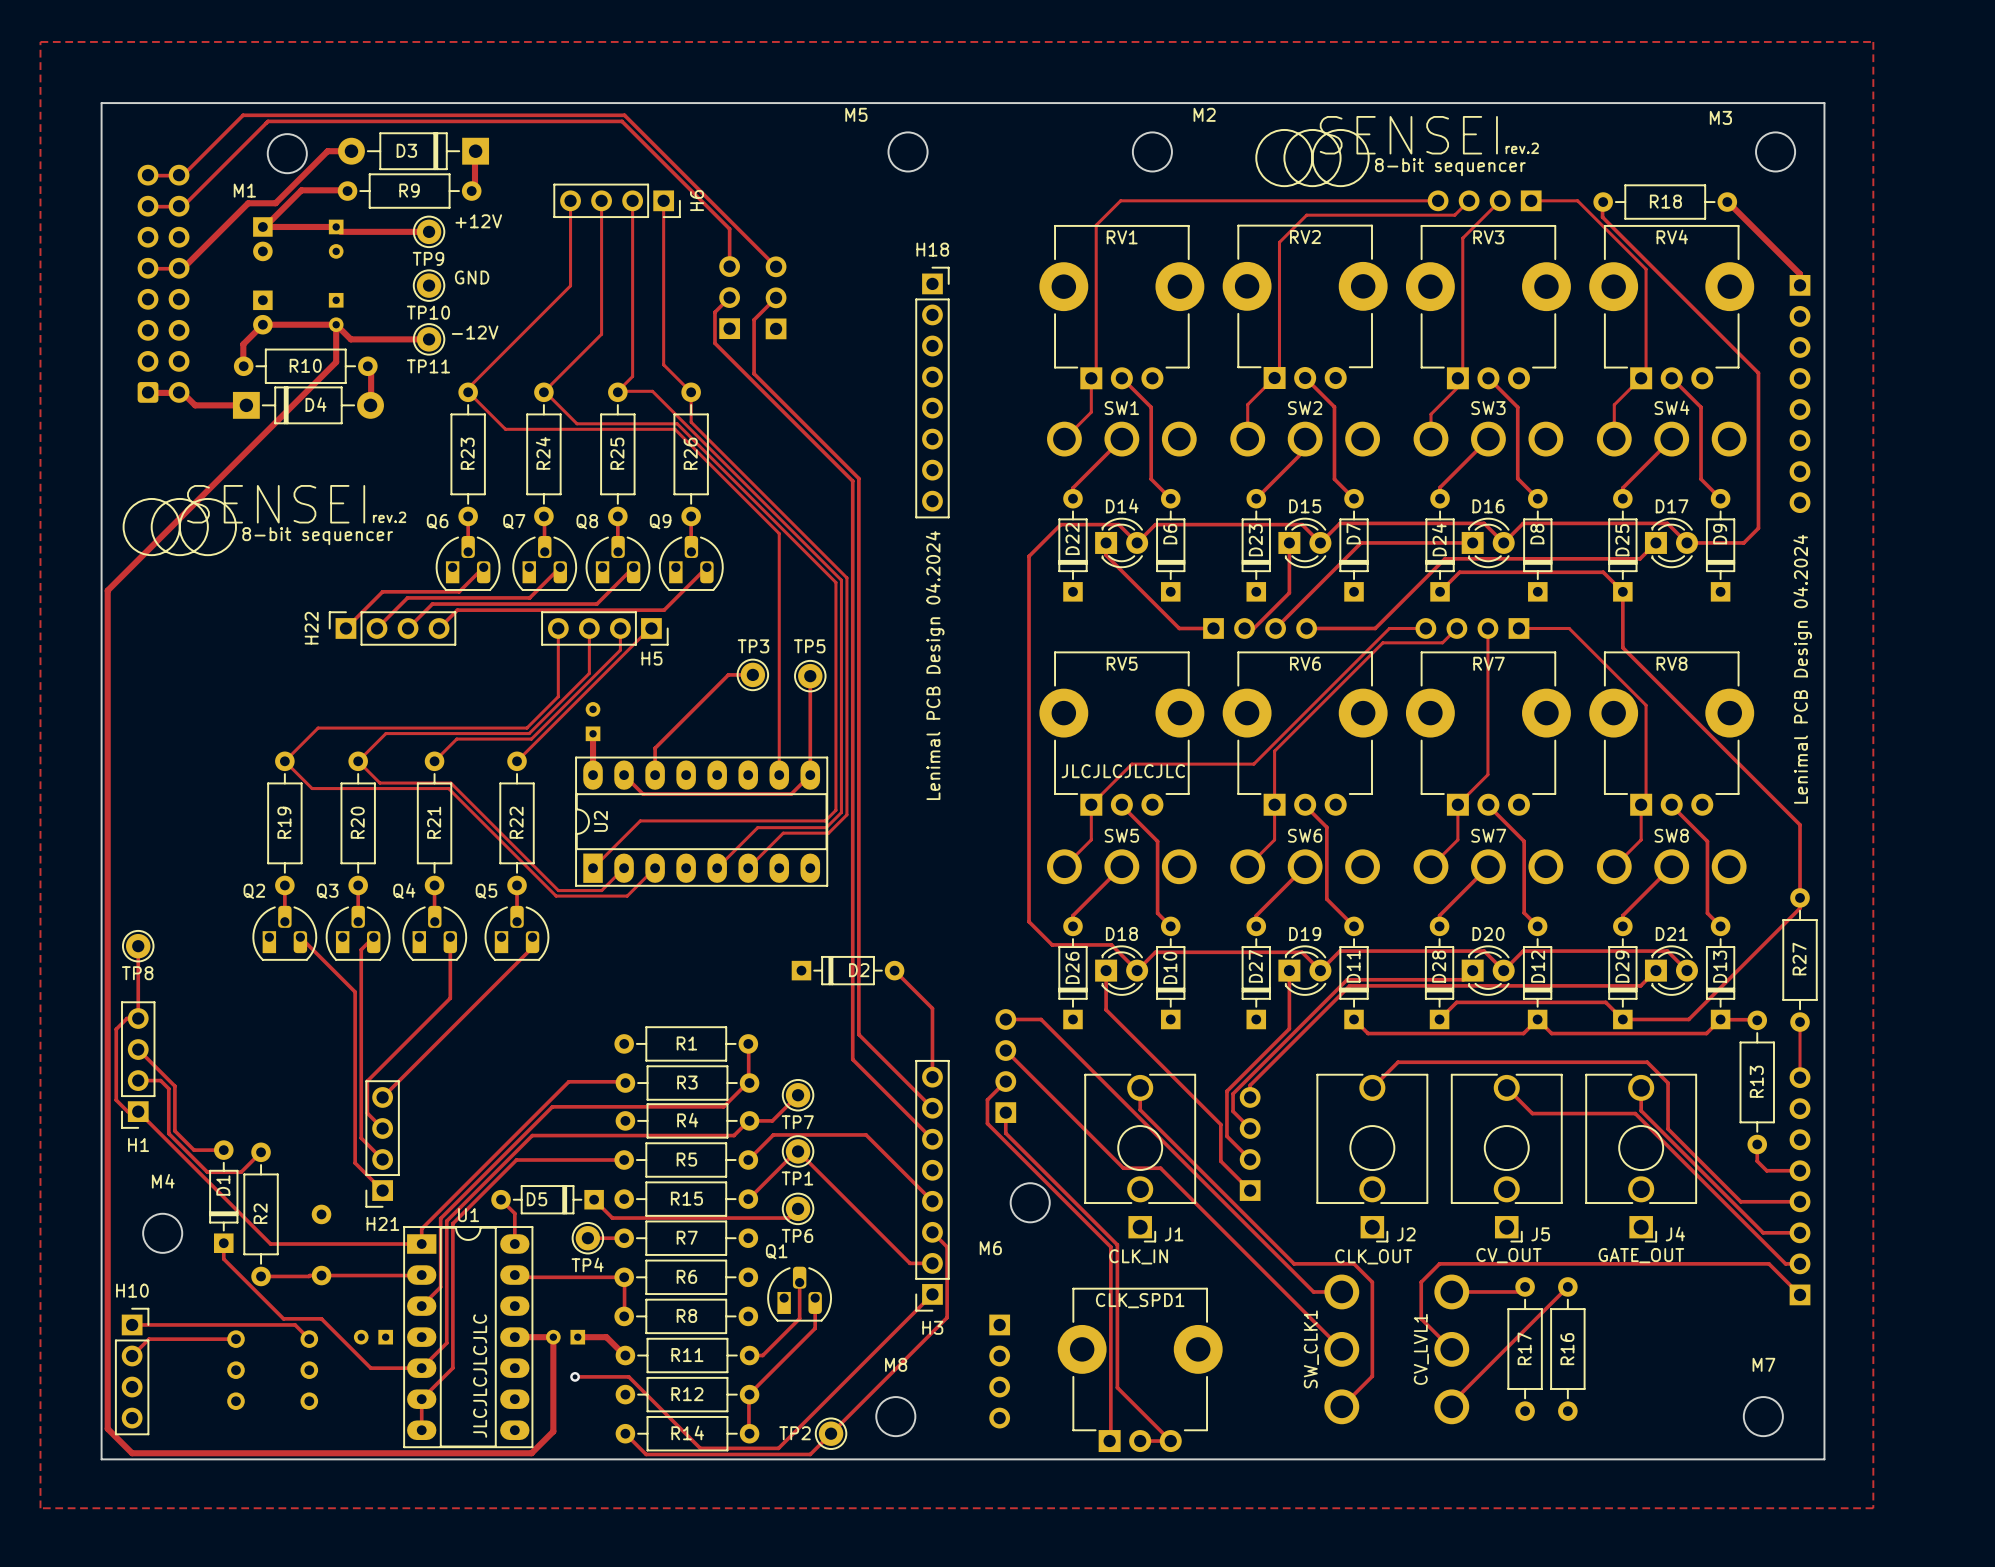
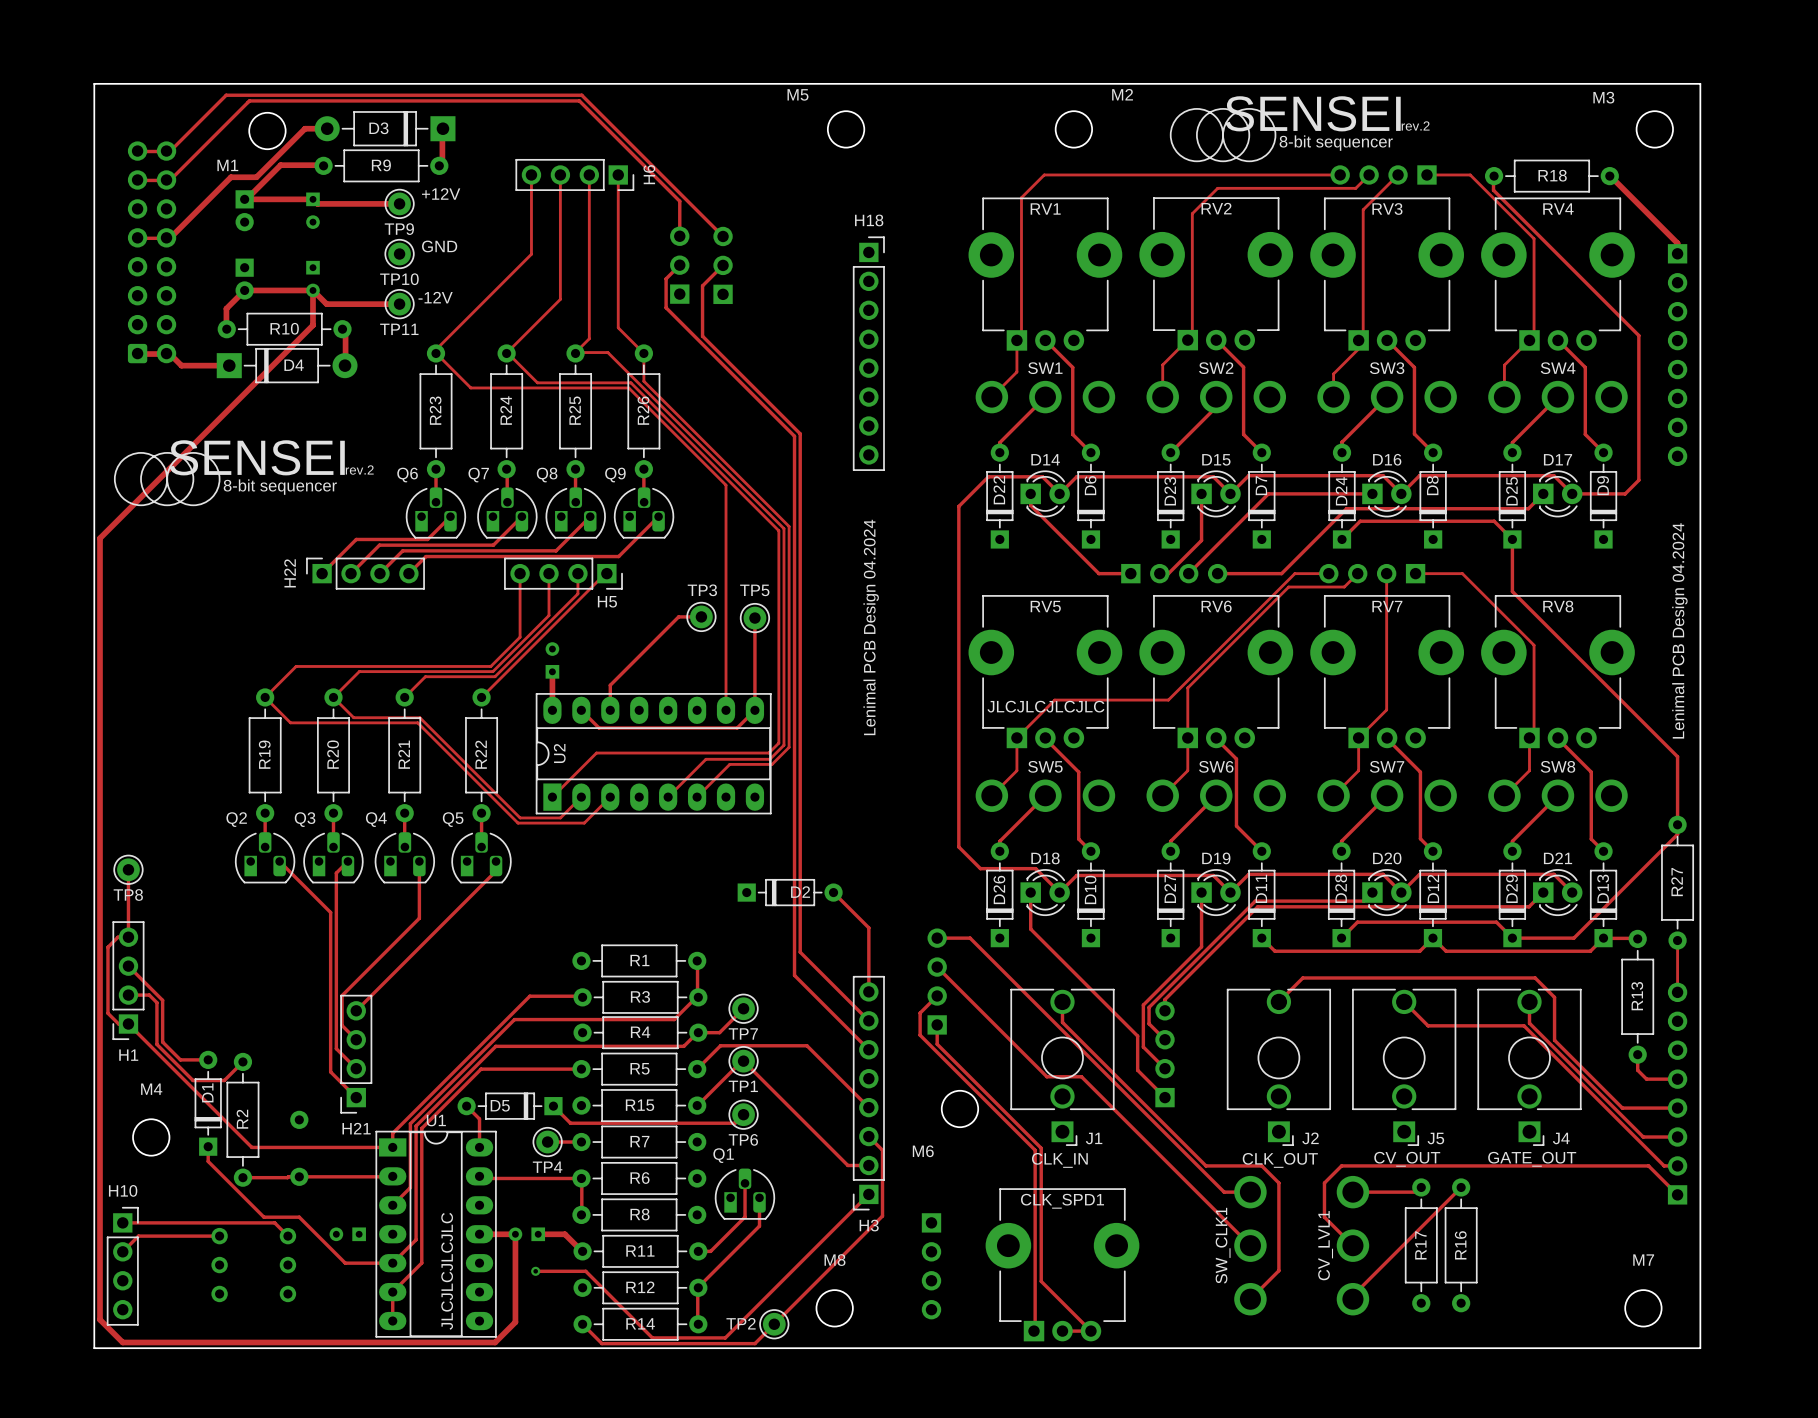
zone outline: (40, 41) (1873, 41) (1873, 1508) (40, 1508) (40, 41) -> none

